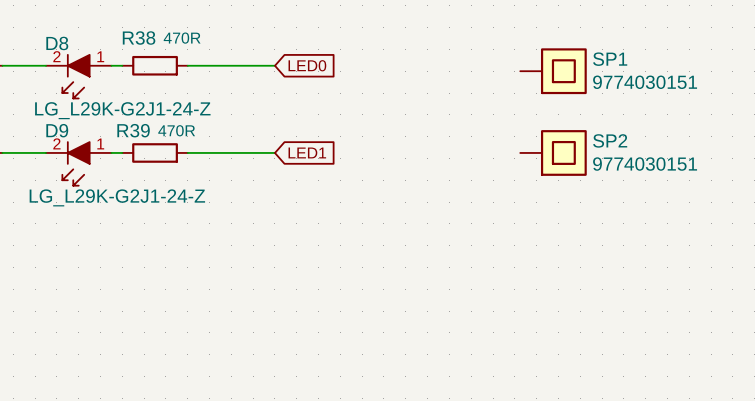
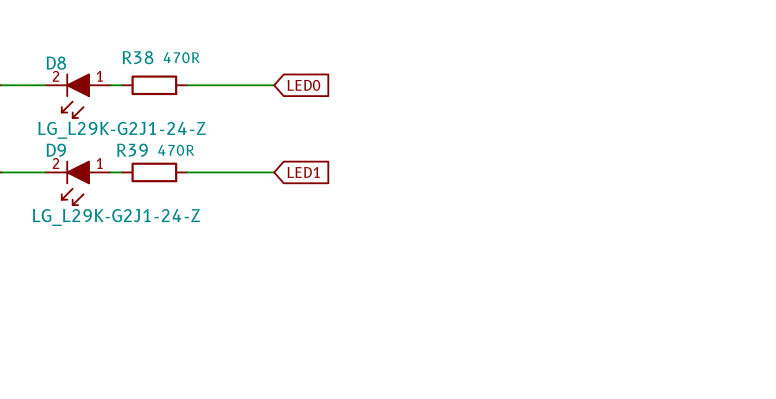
SP1: 9774030151 (553, 71) -> none
SP2: 9774030151 (553, 152) -> none

